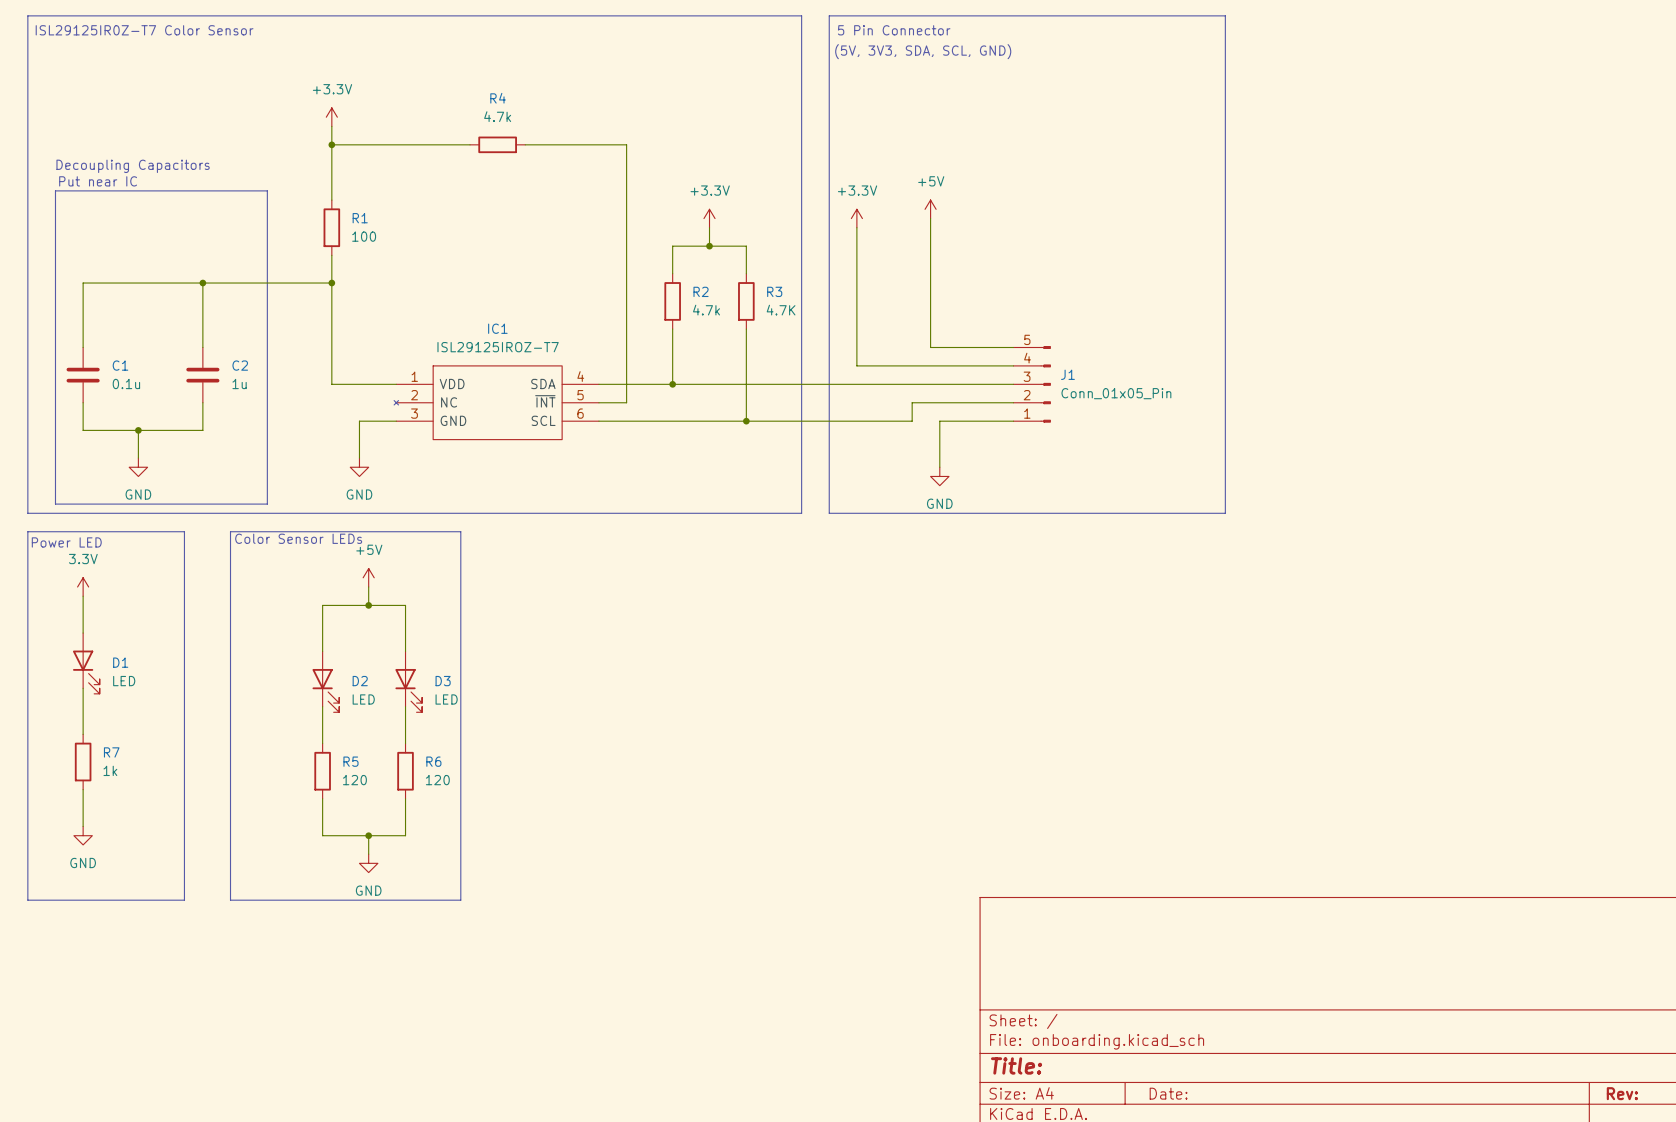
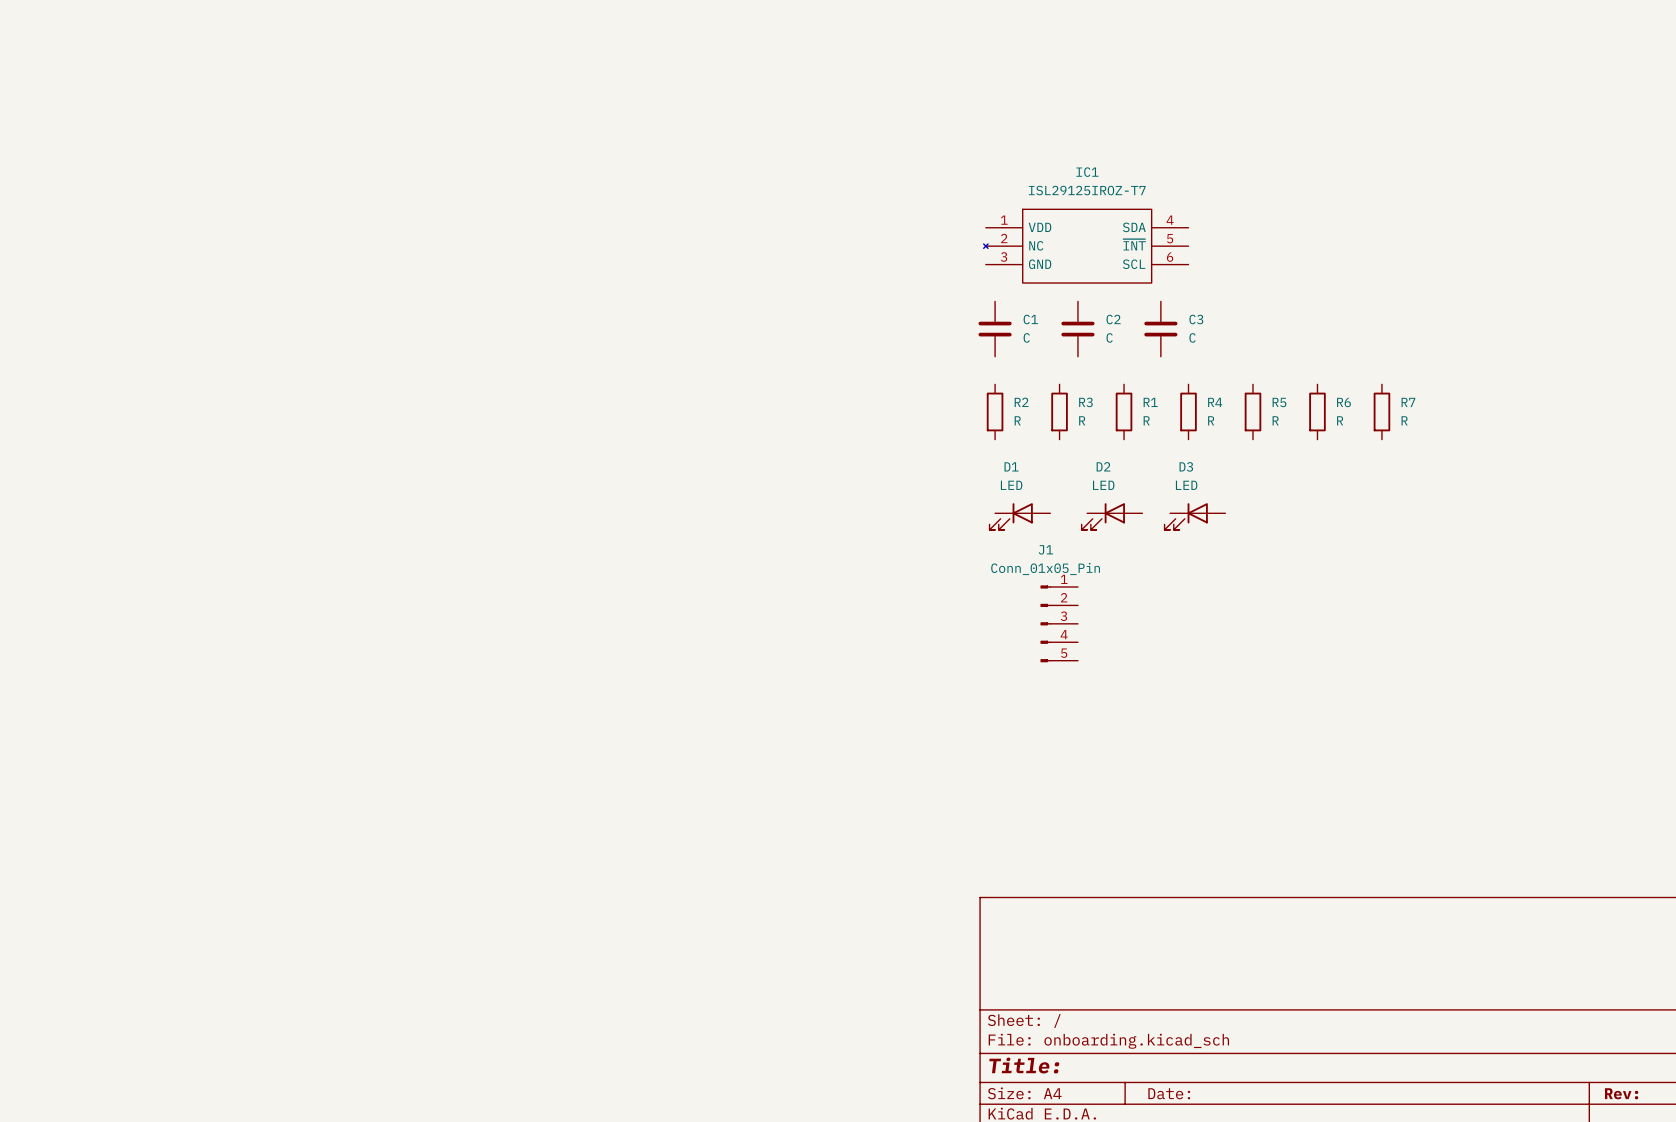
bus: (27, 15) (801, 15) (801, 513) (27, 513) (27, 15) -> none
bus: (829, 15) (1225, 15) (1225, 513) (829, 513) (829, 15) -> none
text: ISL29125IR0Z-T7 Color Sensor (144, 30) -> none
text: 5 Pin Connector (894, 30) -> none
text: (5V, 3V3, SDA, SCL, GND) (923, 51) -> none
R4 name position: R4 (498, 98) -> R4 (1215, 402)
R4 value: 4.7k (497, 116) -> R (1211, 420)
power symbol: +3.3V (331, 117) -> none
wire: (331, 126) (331, 200) -> none
wire: (331, 144) (470, 144) -> none
junction: (331, 144) -> none
R4 rotation: 0° (497, 144) -> 90° clockwise (1188, 411)
R4 position: (497, 144) -> (1188, 411)
wire: (525, 144) (626, 144) (626, 402) (598, 402) -> none
text: Decoupling Capacitors (133, 166) -> none
text: Put near IC (98, 181) -> none
bus: (55, 190) (267, 190) (267, 504) (55, 504) (55, 190) -> none
power symbol: +5V (930, 209) -> none
power symbol: +3.3V (709, 218) -> none
power symbol: +3.3V (856, 218) -> none
wire: (930, 218) (930, 347) (1013, 347) -> none
R1 position: (331, 227) -> (1124, 411)
wire: (709, 227) (709, 246) -> none
wire: (856, 227) (856, 365) (1013, 365) -> none
R1 value: 100 (364, 236) -> R (1146, 420)
junction: (709, 246) -> none
wire: (331, 255) (331, 384) (396, 384) -> none
wire: (672, 273) (672, 246) (746, 246) (746, 273) -> none
wire: (202, 283) (202, 347) -> none
junction: (202, 283) -> none
wire: (331, 283) (83, 283) (83, 347) -> none
junction: (331, 283) -> none
R2 position: (672, 301) -> (995, 411)
R3 position: (746, 301) -> (1059, 411)
R2 value: 4.7k (706, 310) -> R (1017, 420)
R3 value: 4.7K (781, 310) -> R (1082, 420)
wire: (672, 329) (672, 384) -> none
wire: (746, 329) (746, 421) -> none
C3: none -> C (1160, 329)
J1 name position: J1 (1067, 374) -> J1 (1045, 549)
C1 position: (83, 375) -> (995, 329)
C2 position: (202, 375) -> (1077, 329)
C1 value: 0.1u (126, 383) -> C (1026, 337)
C2 value: 1u (239, 383) -> C (1109, 337)
wire: (598, 384) (1013, 384) -> none
junction: (672, 384) -> none
J1 position: (1032, 384) -> (1059, 623)
J1 rotation: 0° (1045, 384) -> 180° (1045, 623)
J1 value position: Conn_01x05_Pin (1116, 393) -> Conn_01x05_Pin (1045, 569)
wire: (83, 402) (83, 430) (202, 430) (202, 402) -> none
IC1 position: (496, 402) -> (1086, 246)
wire: (1013, 402) (912, 402) (912, 421) (598, 421) -> none
wire: (396, 421) (359, 421) (359, 458) -> none
junction: (746, 421) -> none
wire: (1013, 421) (939, 421) (939, 467) -> none
wire: (138, 430) (138, 458) -> none
junction: (138, 430) -> none
power symbol: GND (138, 467) -> none
power symbol: GND (359, 467) -> none
power symbol: GND (939, 476) -> none
bus: (27, 531) (184, 531) (184, 900) (27, 900) (27, 531) -> none
bus: (230, 531) (460, 531) (460, 900) (230, 900) (230, 531) -> none
text: Color Sensor LEDs (298, 538) -> none
text: Power LED (66, 542) -> none
power symbol: +5V (368, 577) -> none
power symbol: 3.3V (83, 586) -> none
wire: (368, 586) (368, 605) -> none
wire: (83, 596) (83, 633) -> none
junction: (368, 605) -> none
wire: (322, 651) (322, 605) (405, 605) (405, 651) -> none
D1 name position: D1 (120, 662) -> D1 (1011, 466)
D1 position: (86, 663) -> (1019, 516)
D1 rotation: 0° (86, 672) -> 90° clockwise (1011, 516)
D1 value position: LED (124, 681) -> LED (1011, 485)
D2 position: (325, 681) -> (1112, 516)
D2 name position: D2 (360, 681) -> D2 (1103, 466)
D3 position: (408, 681) -> (1194, 516)
D3 name position: D3 (443, 681) -> D3 (1186, 466)
wire: (83, 688) (83, 734) -> none
D2 rotation: 0° (325, 690) -> 90° clockwise (1103, 516)
D3 rotation: 0° (408, 690) -> 90° clockwise (1186, 516)
D2 value position: LED (363, 699) -> LED (1103, 485)
D3 value position: LED (446, 699) -> LED (1186, 485)
wire: (322, 706) (322, 743) -> none
wire: (405, 706) (405, 743) -> none
R7 position: (83, 762) -> (1381, 411)
R7 value: 1k (110, 770) -> R (1404, 420)
R5 position: (322, 771) -> (1252, 411)
R6 position: (405, 771) -> (1317, 411)
R5 value: 120 (354, 780) -> R (1275, 420)
R6 value: 120 (437, 780) -> R (1340, 420)
wire: (83, 789) (83, 826) -> none
wire: (322, 798) (322, 835) (405, 835) (405, 798) -> none
power symbol: GND (83, 835) -> none
wire: (368, 835) (368, 854) -> none
junction: (368, 835) -> none
power symbol: GND (368, 863) -> none

